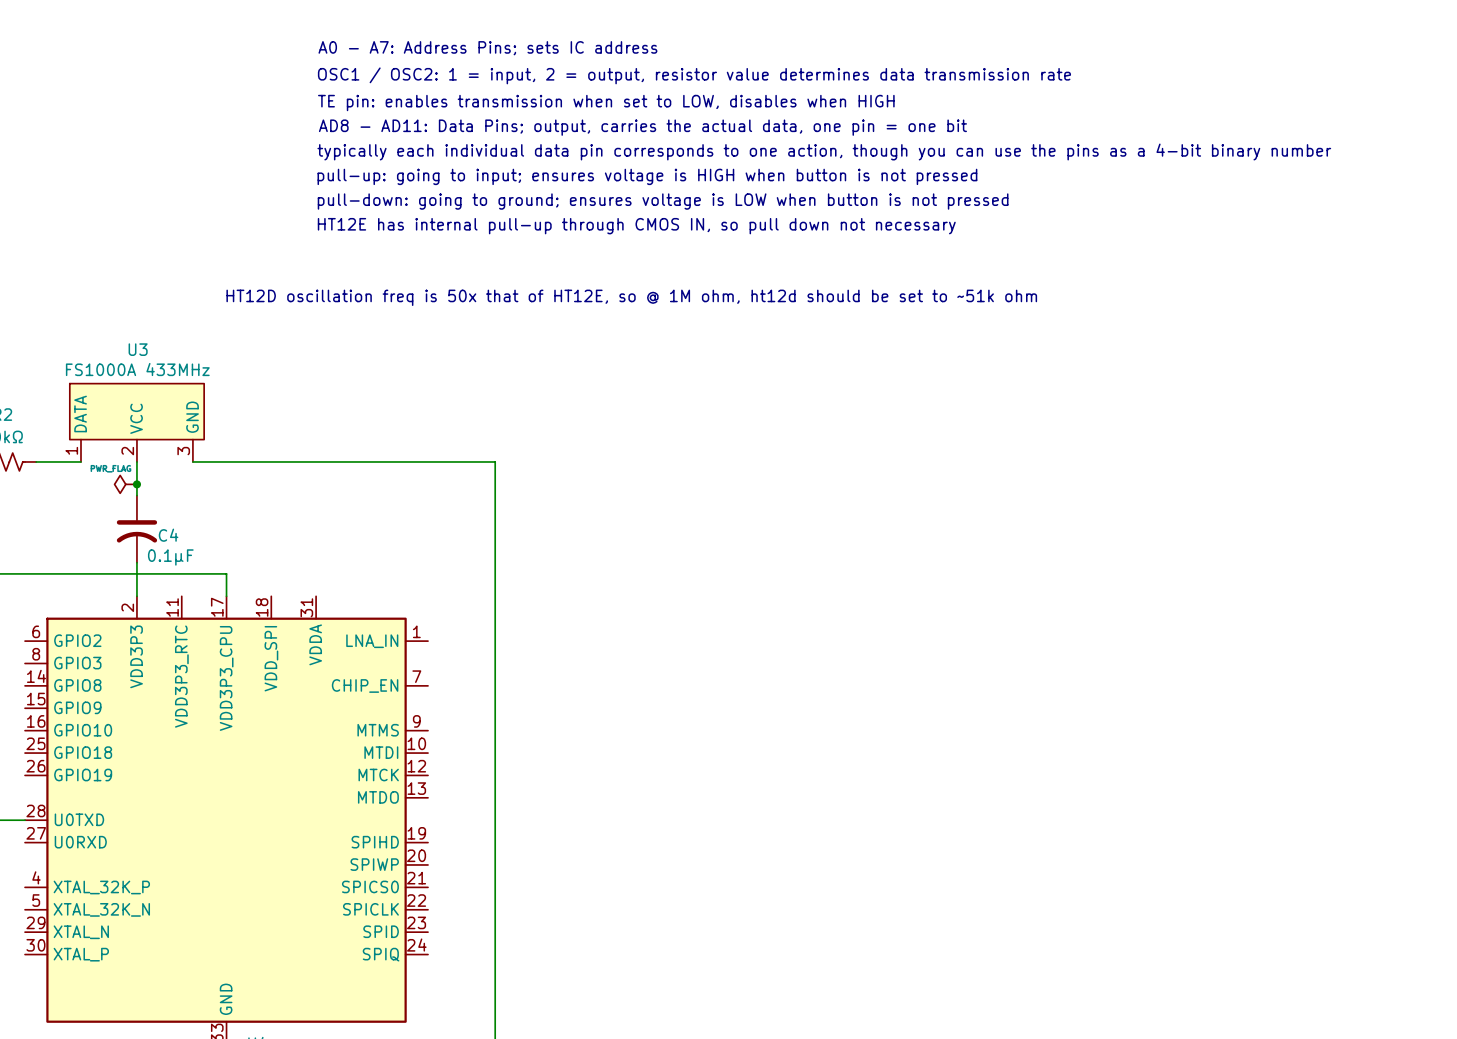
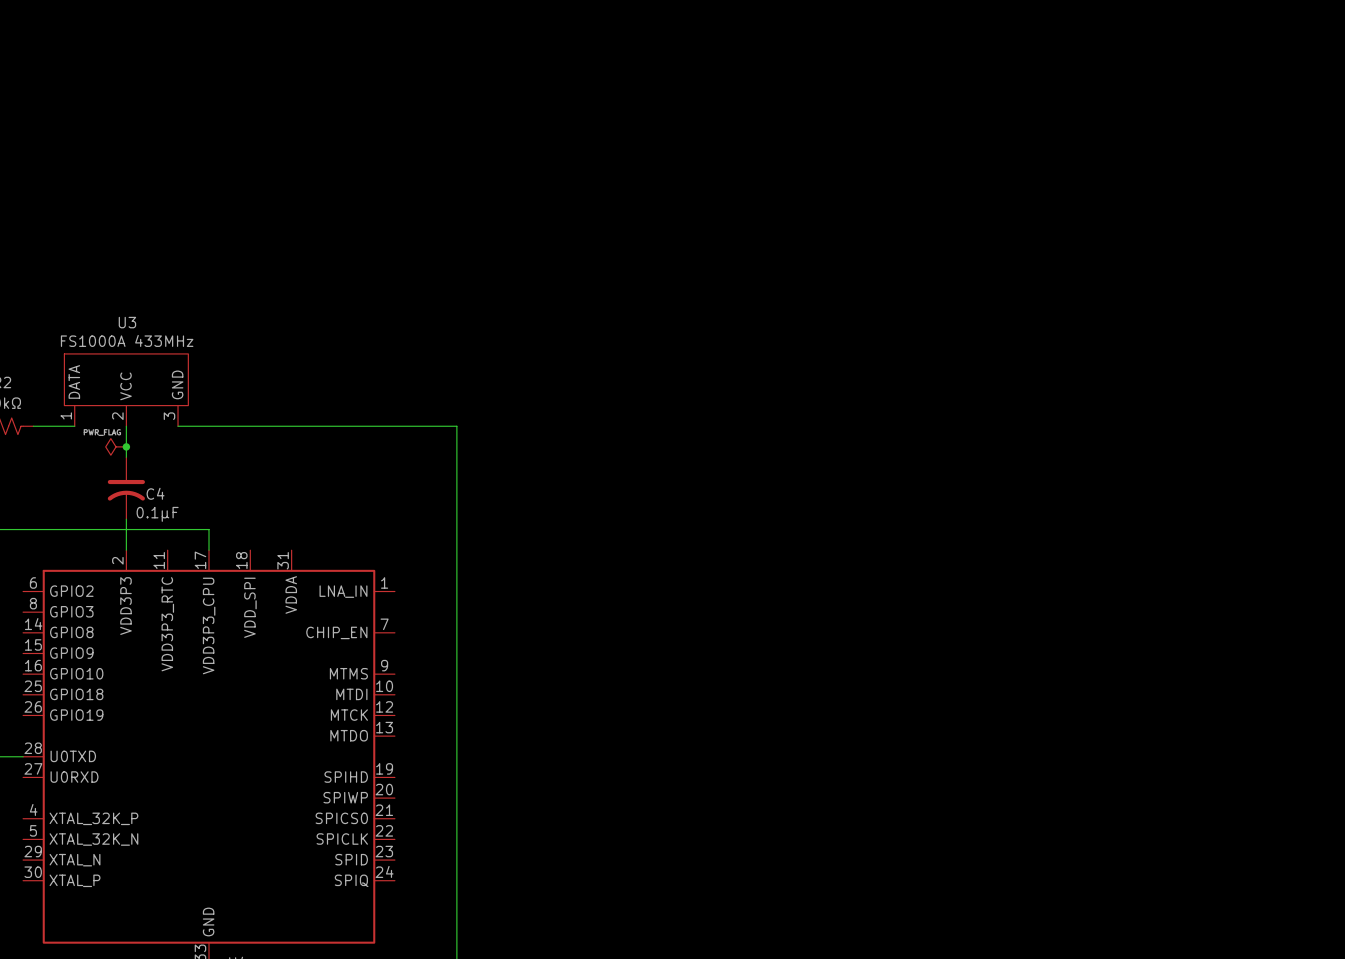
text: A0 - A7: Address Pins; sets IC address (487, 48) -> none
text: OSC1 / OSC2: 1 = input, 2 = output, resistor value determines data transmission rate (694, 75) -> none
text: TE pin: enables transmission when set to LOW, disables when HIGH (606, 103) -> none
text: AD8 - AD11: Data Pins; output, carries the actual data, one pin = one bit (642, 127) -> none
text: typically each individual data pin corresponds to one action, though you can use the pins as a 4-bit binary number (824, 152) -> none
text: pull-up: going to input; ensures voltage is HIGH when button is not pressed (647, 176) -> none
text: pull-down: going to ground; ensures voltage is LOW when button is not pressed (663, 201) -> none
text: HT12E has internal pull-up through CMOS IN, so pull down not necessary (636, 226) -> none
text: HT12D oscillation freq is 50x that of HT12E, so @ 1M ohm, ht12d should be set to ~51k ohm (631, 297) -> none

